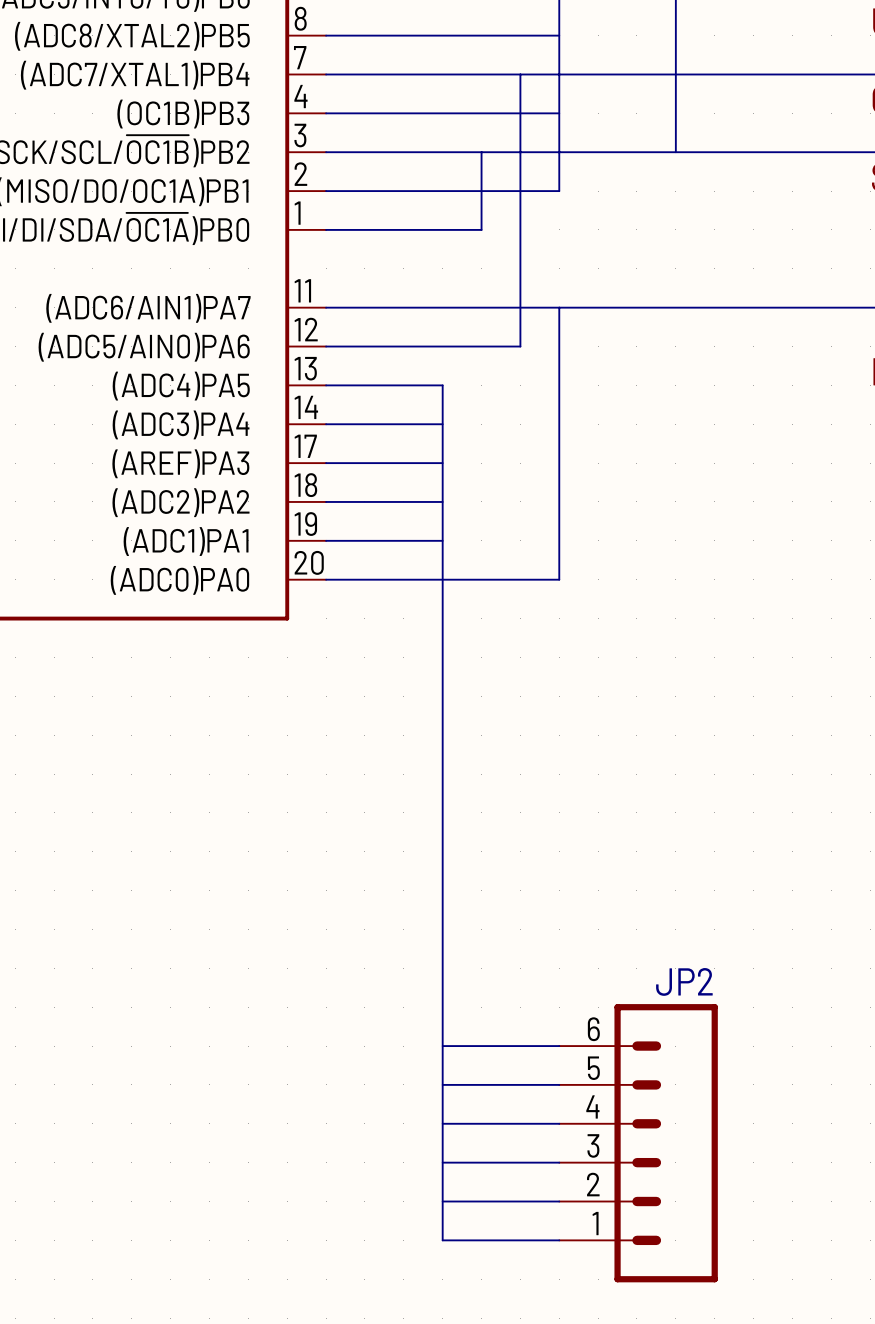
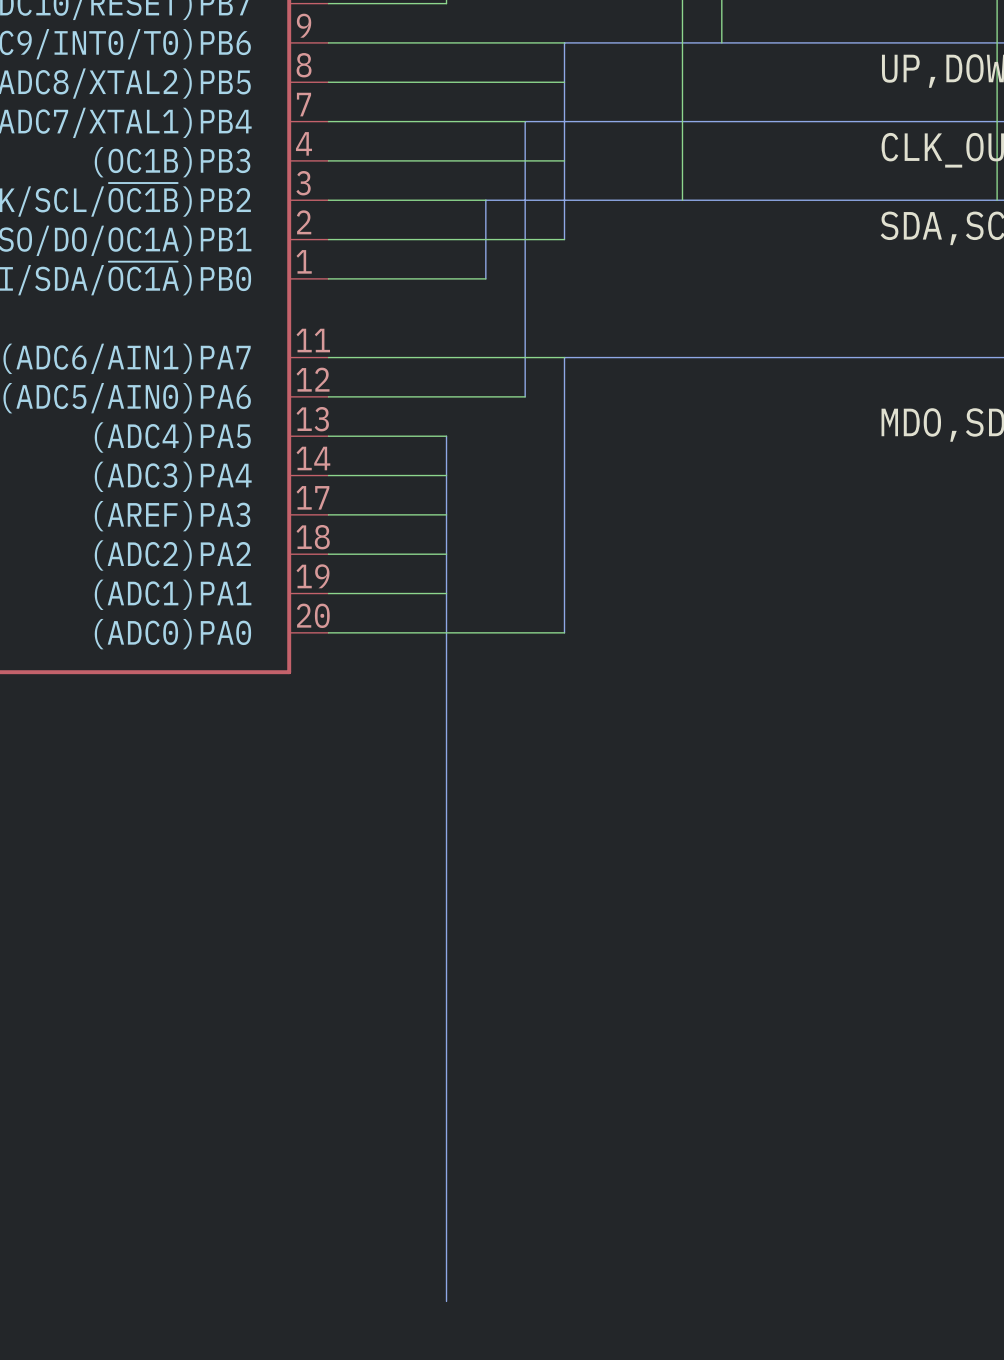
wire: (442, 1046) (559, 1046) -> none
wire: (442, 1084) (559, 1084) -> none
wire: (442, 1123) (559, 1123) -> none
JP2: (638, 1143) -> none
wire: (442, 1162) (559, 1162) -> none
wire: (442, 1201) (559, 1201) -> none
wire: (442, 1240) (559, 1240) -> none

